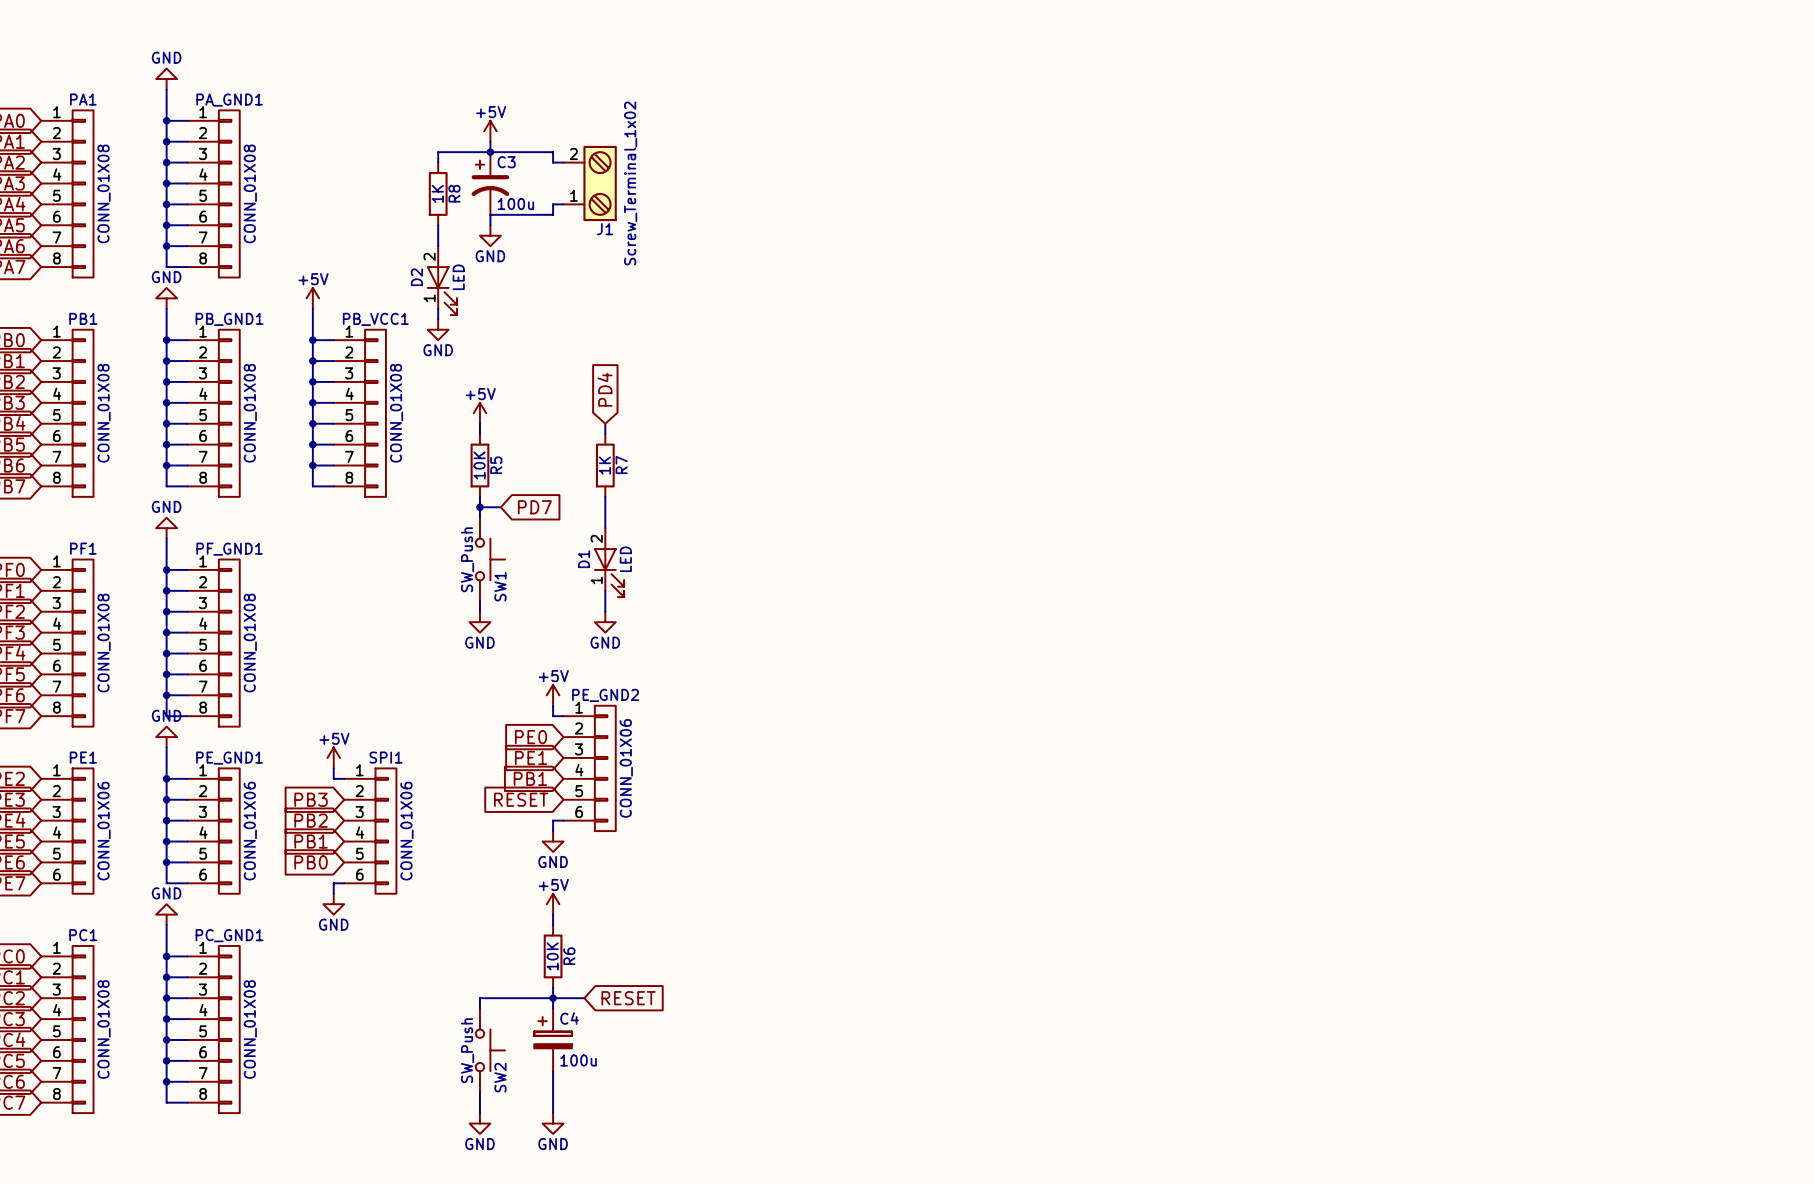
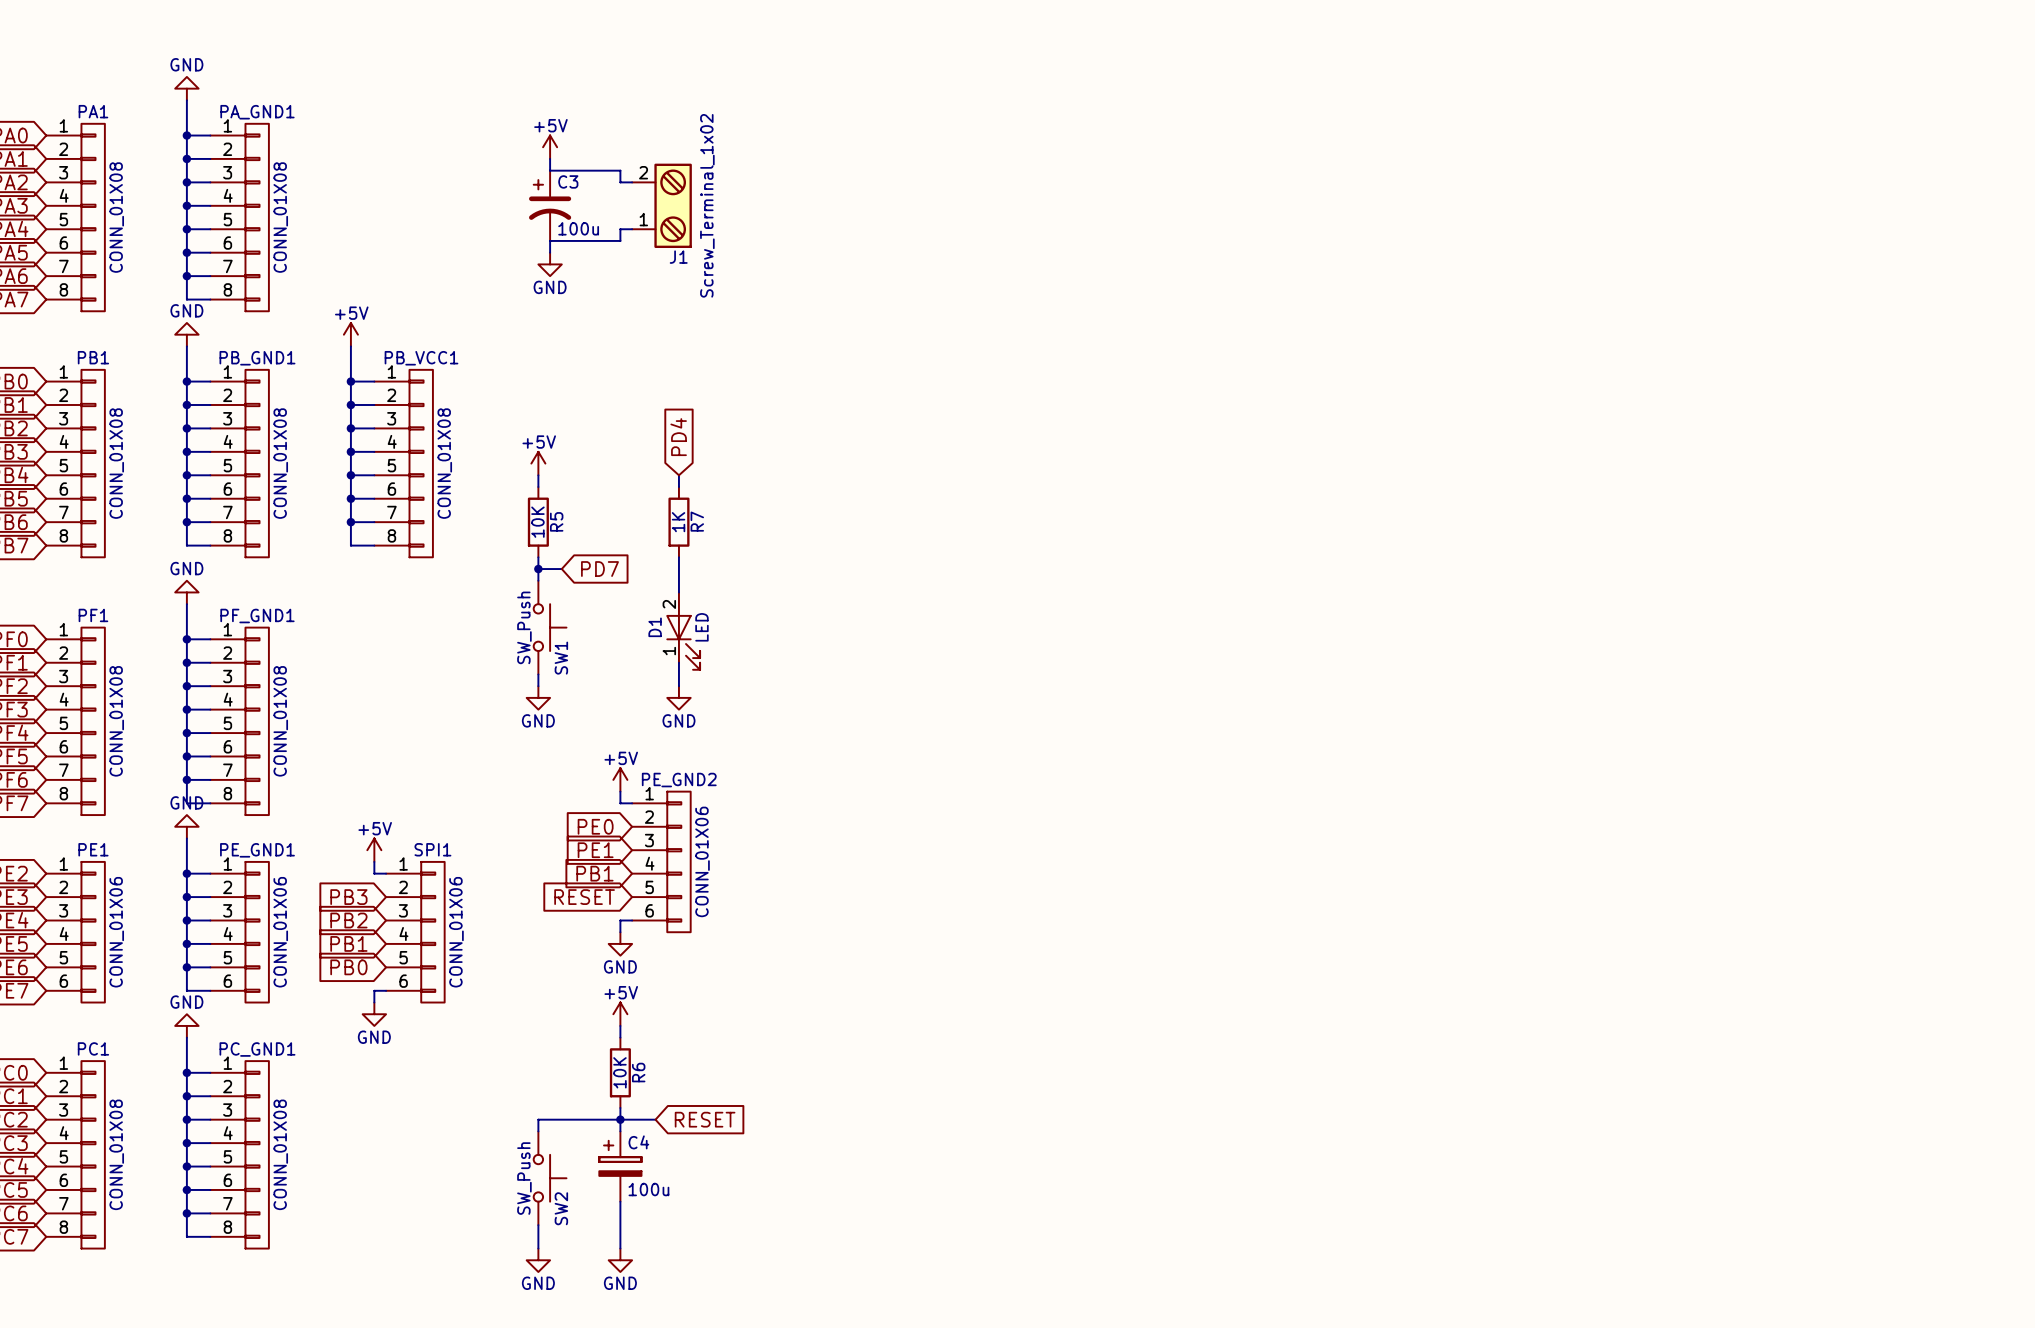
wire: (490, 152) (438, 152) (438, 162) -> none
junction: (490, 152) -> none
R8: 1K (438, 193) -> none
wire: (438, 225) (438, 246) -> none
D2: LED (441, 280) -> none
wire: (438, 308) (438, 319) -> none
power symbol: GND (438, 329) -> none

